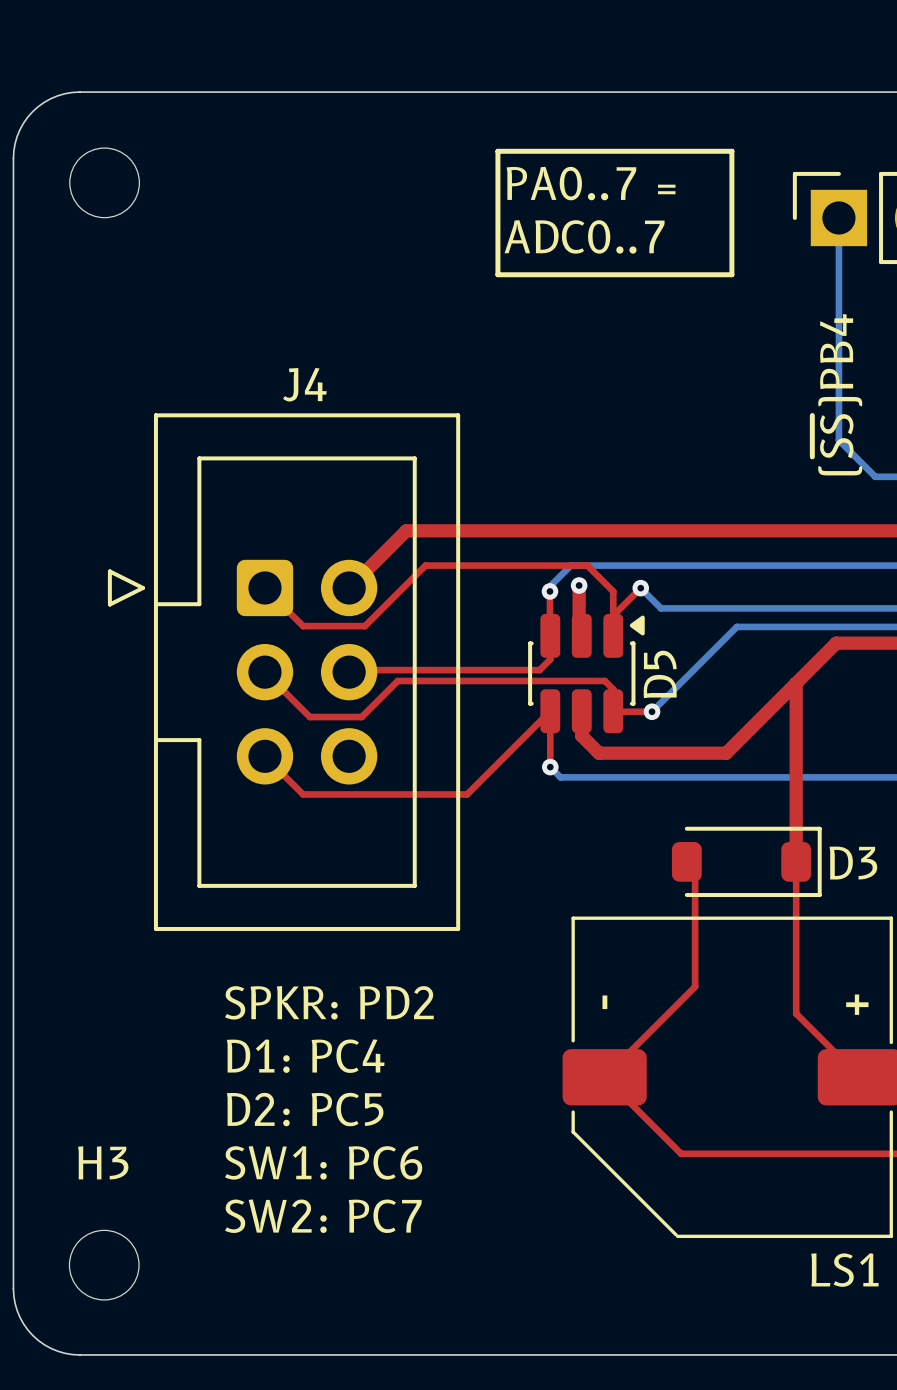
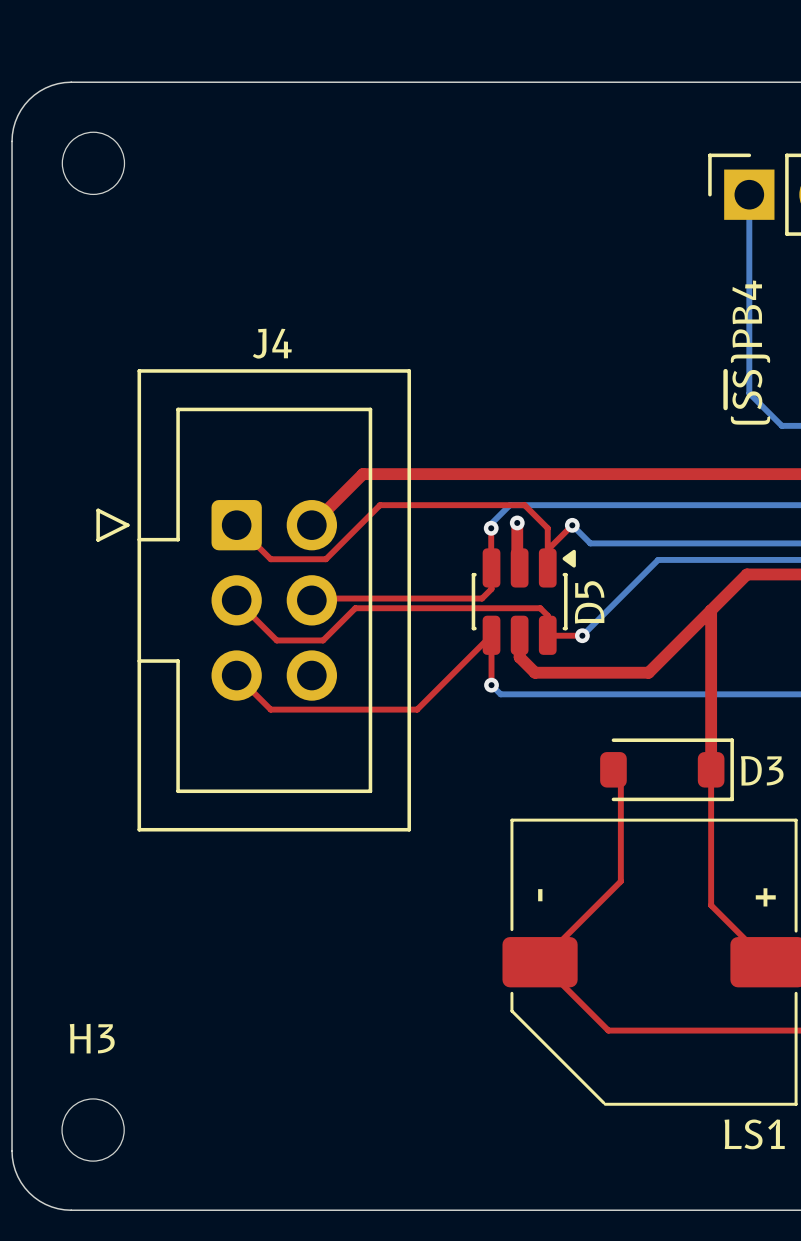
line: (497, 151) (731, 151) (731, 274) (497, 274) (497, 151) -> none
text: PA0..7 = (591, 183) -> none
text: ADC0..7 (584, 236) -> none
text: SPKR: PD2 (329, 1002) -> none
text: D1: PC4 (305, 1056) -> none
text: D2: PC5 (305, 1109) -> none
text: SW1: PC6 (323, 1162) -> none
text: SW2: PC7 (323, 1216) -> none

